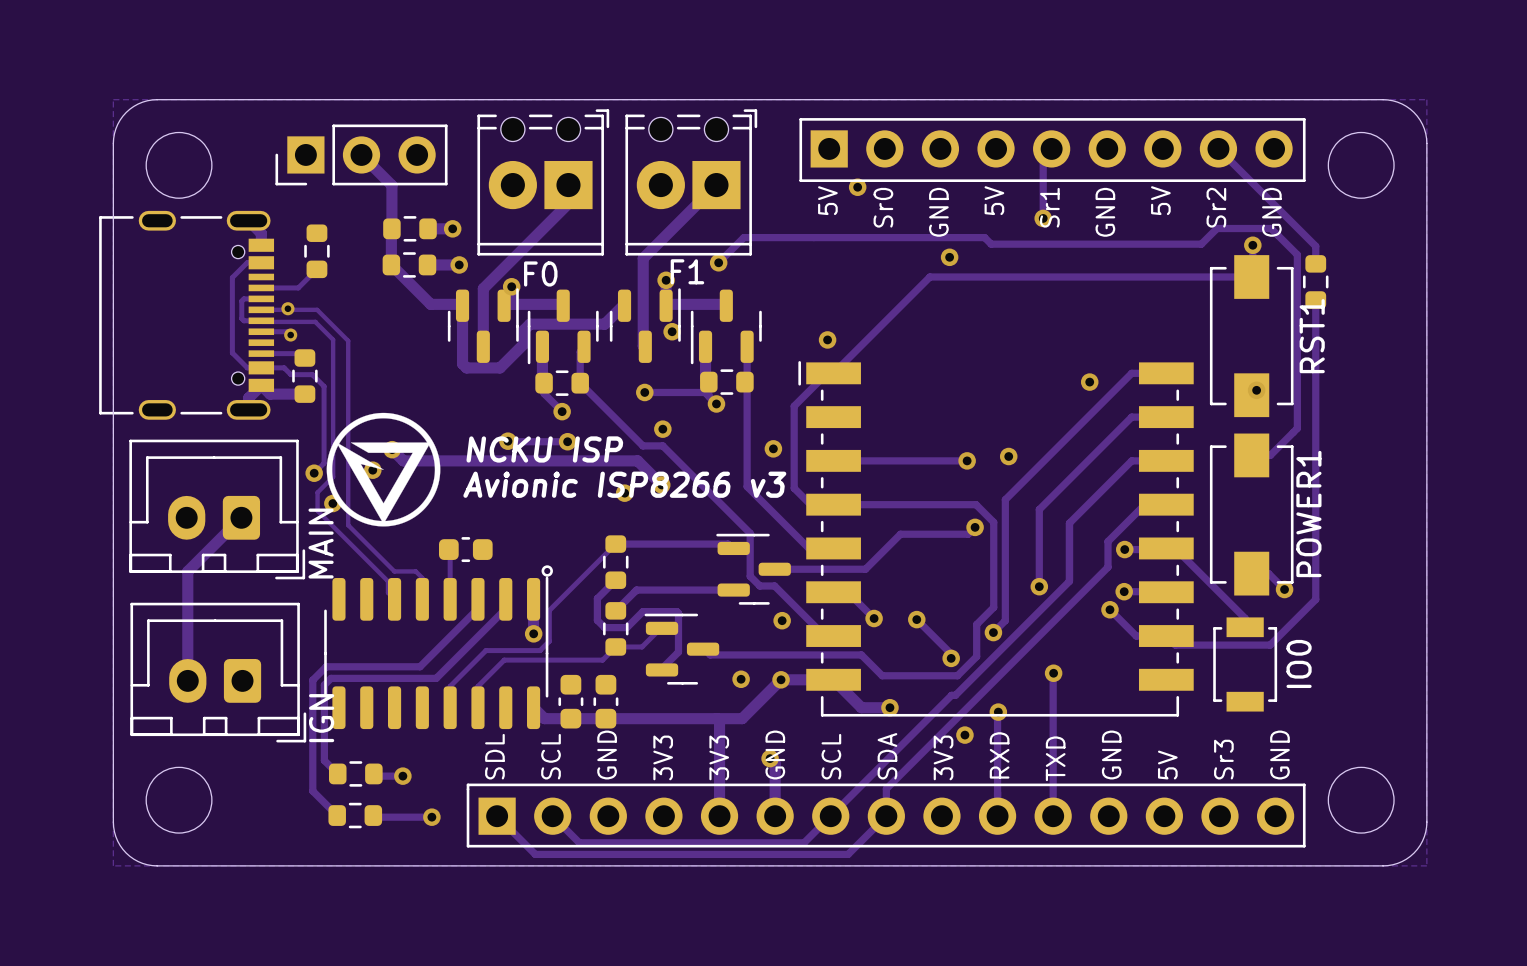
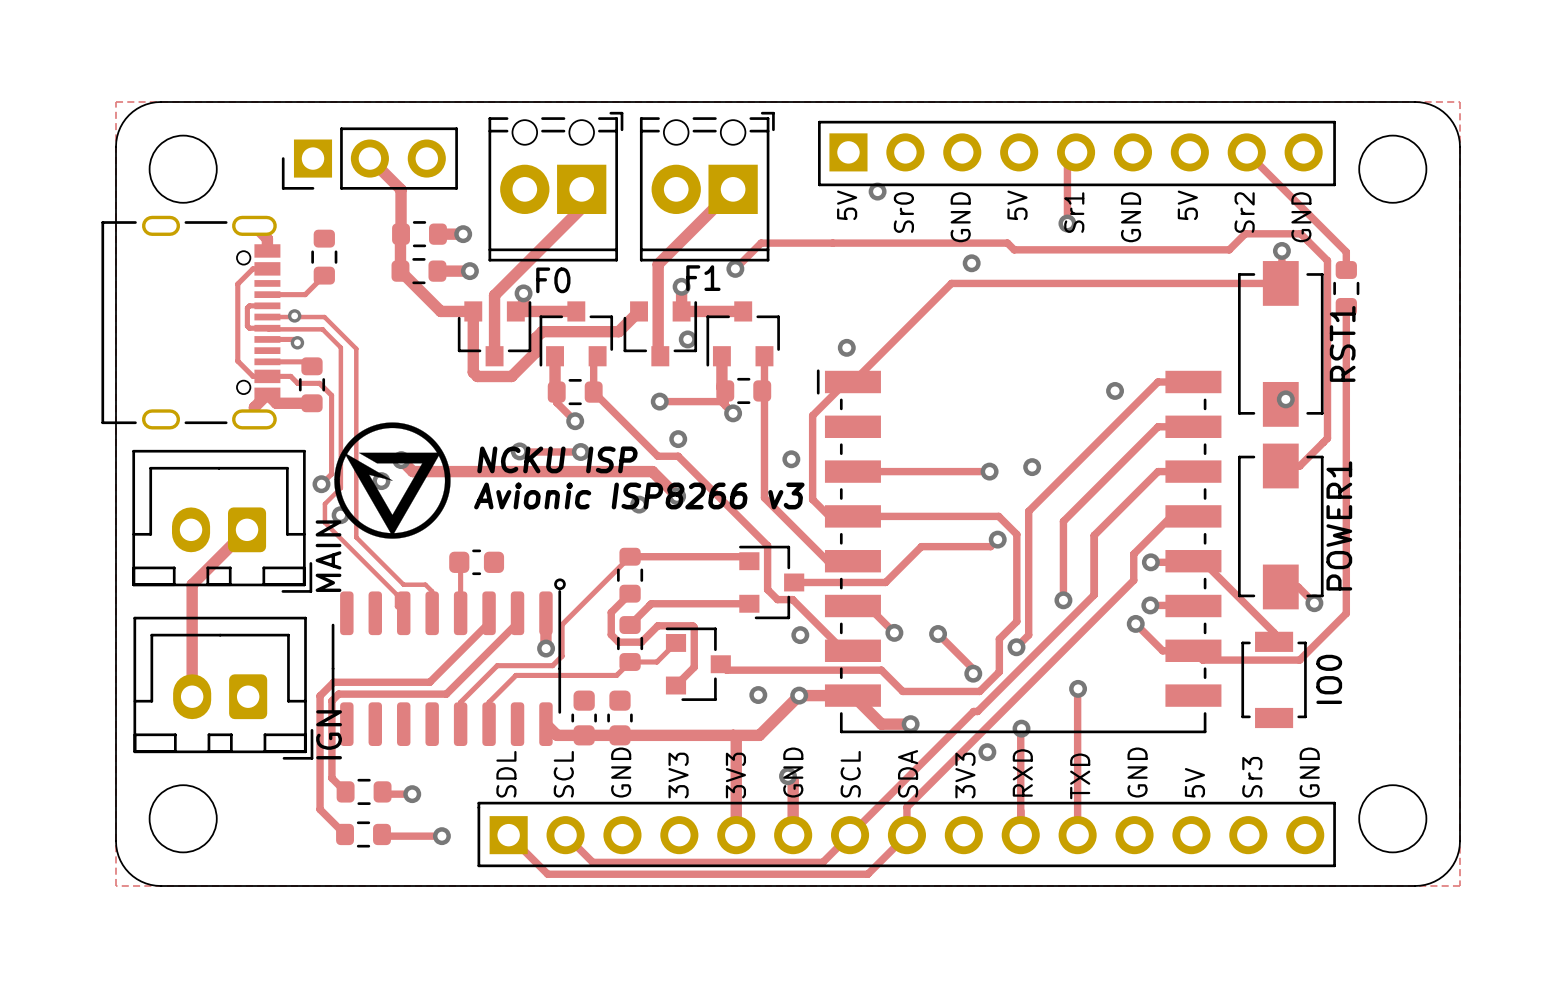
part footprint: [447, 288, 519, 363] -> [457, 301, 532, 367]
part footprint: [609, 288, 681, 363] -> [623, 301, 698, 367]
part footprint: [527, 289, 599, 365] -> [539, 301, 614, 367]
part footprint: [690, 289, 762, 365] -> [706, 301, 780, 367]
part footprint: [716, 533, 791, 605] -> [739, 545, 805, 620]
part footprint: [644, 613, 720, 685] -> [665, 627, 731, 701]

